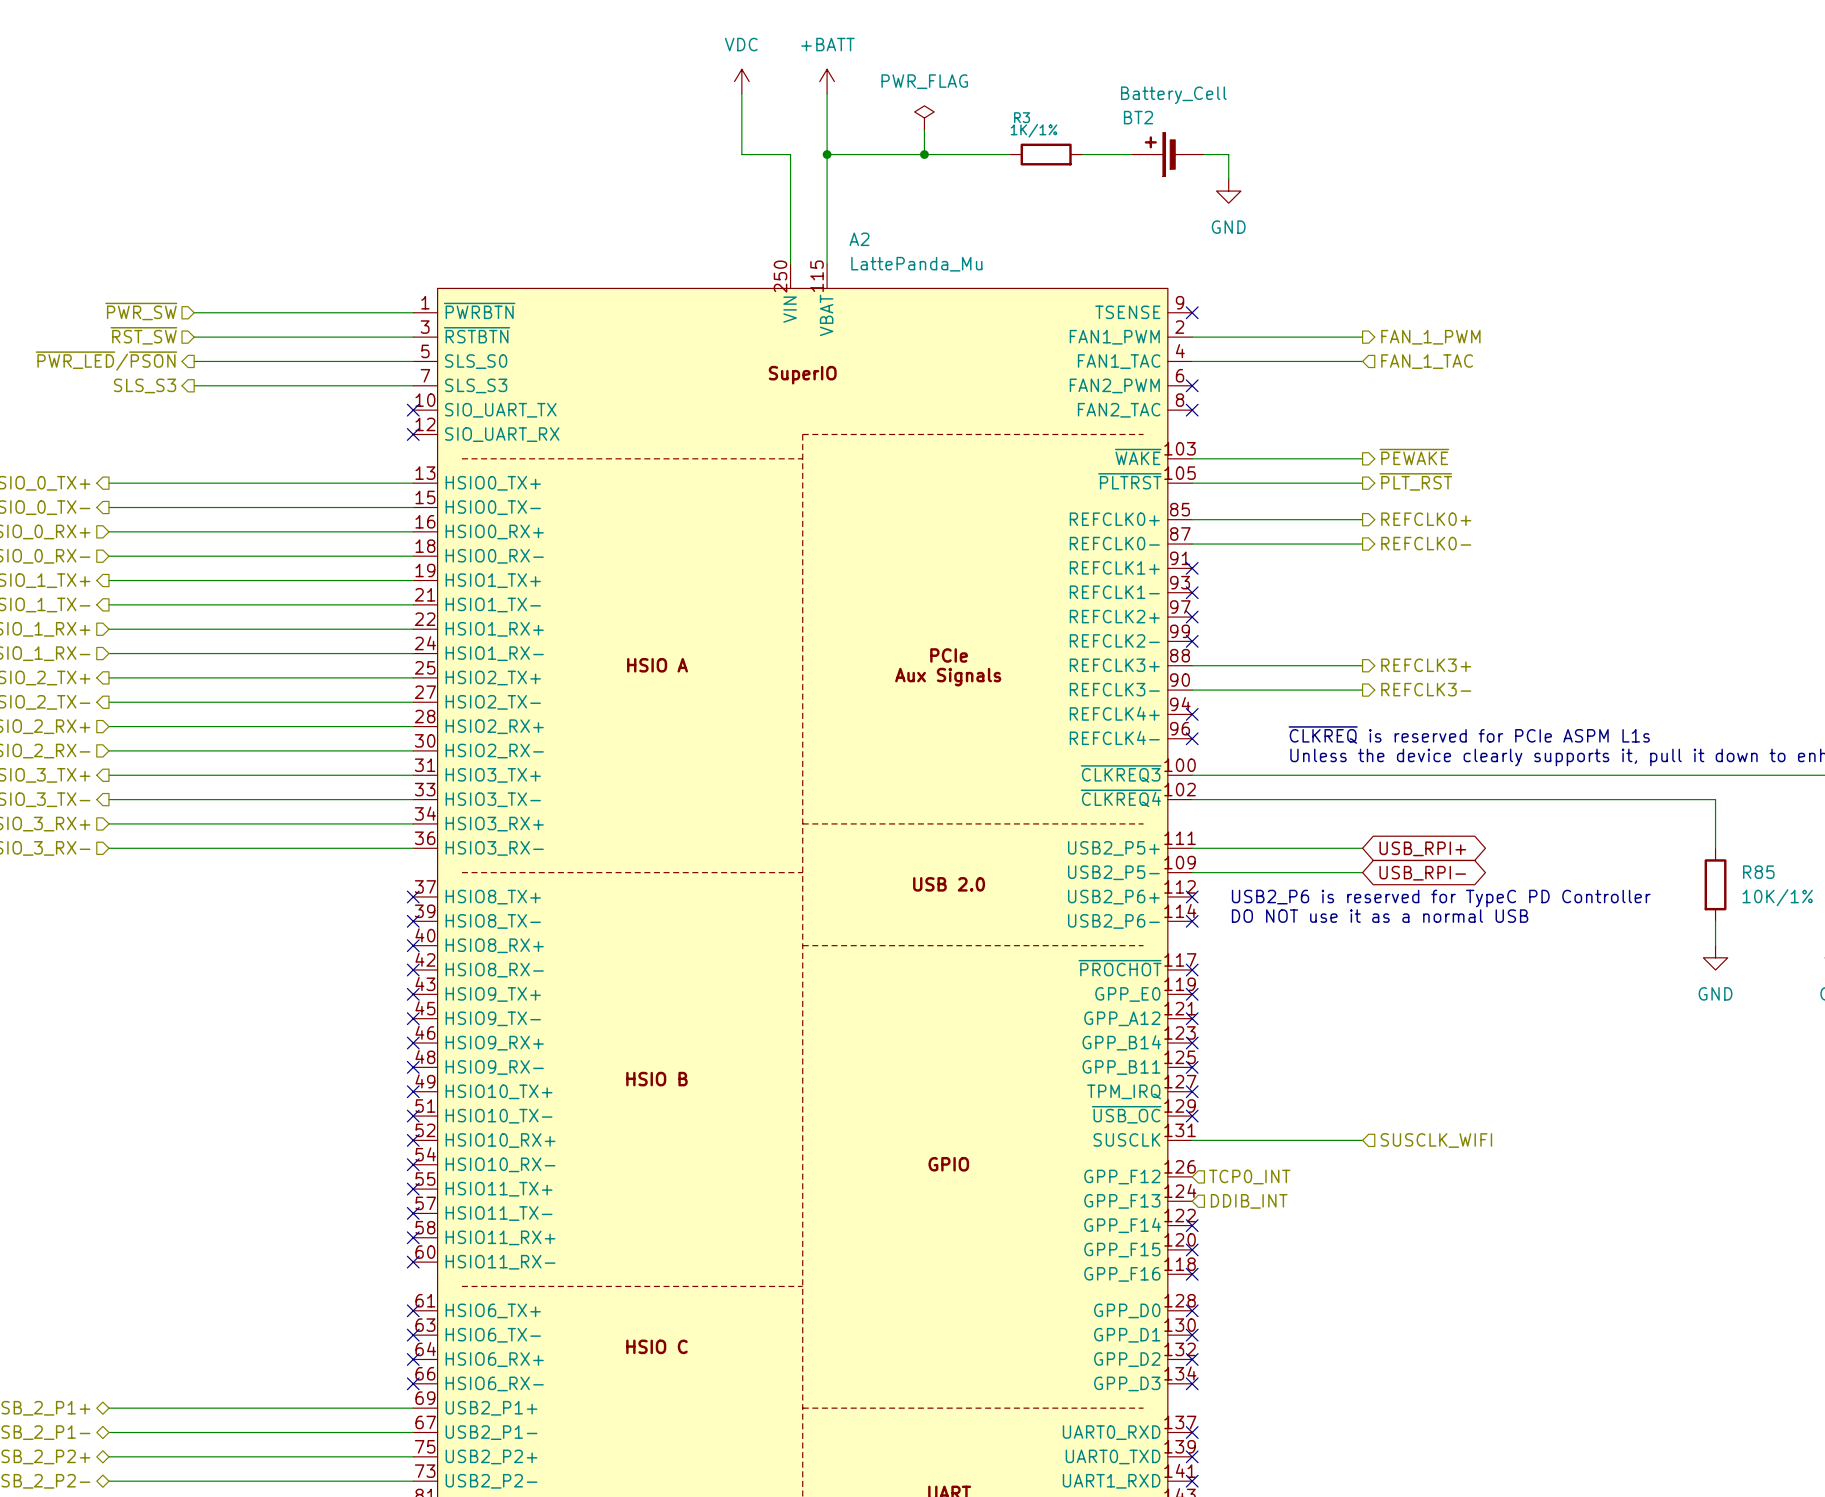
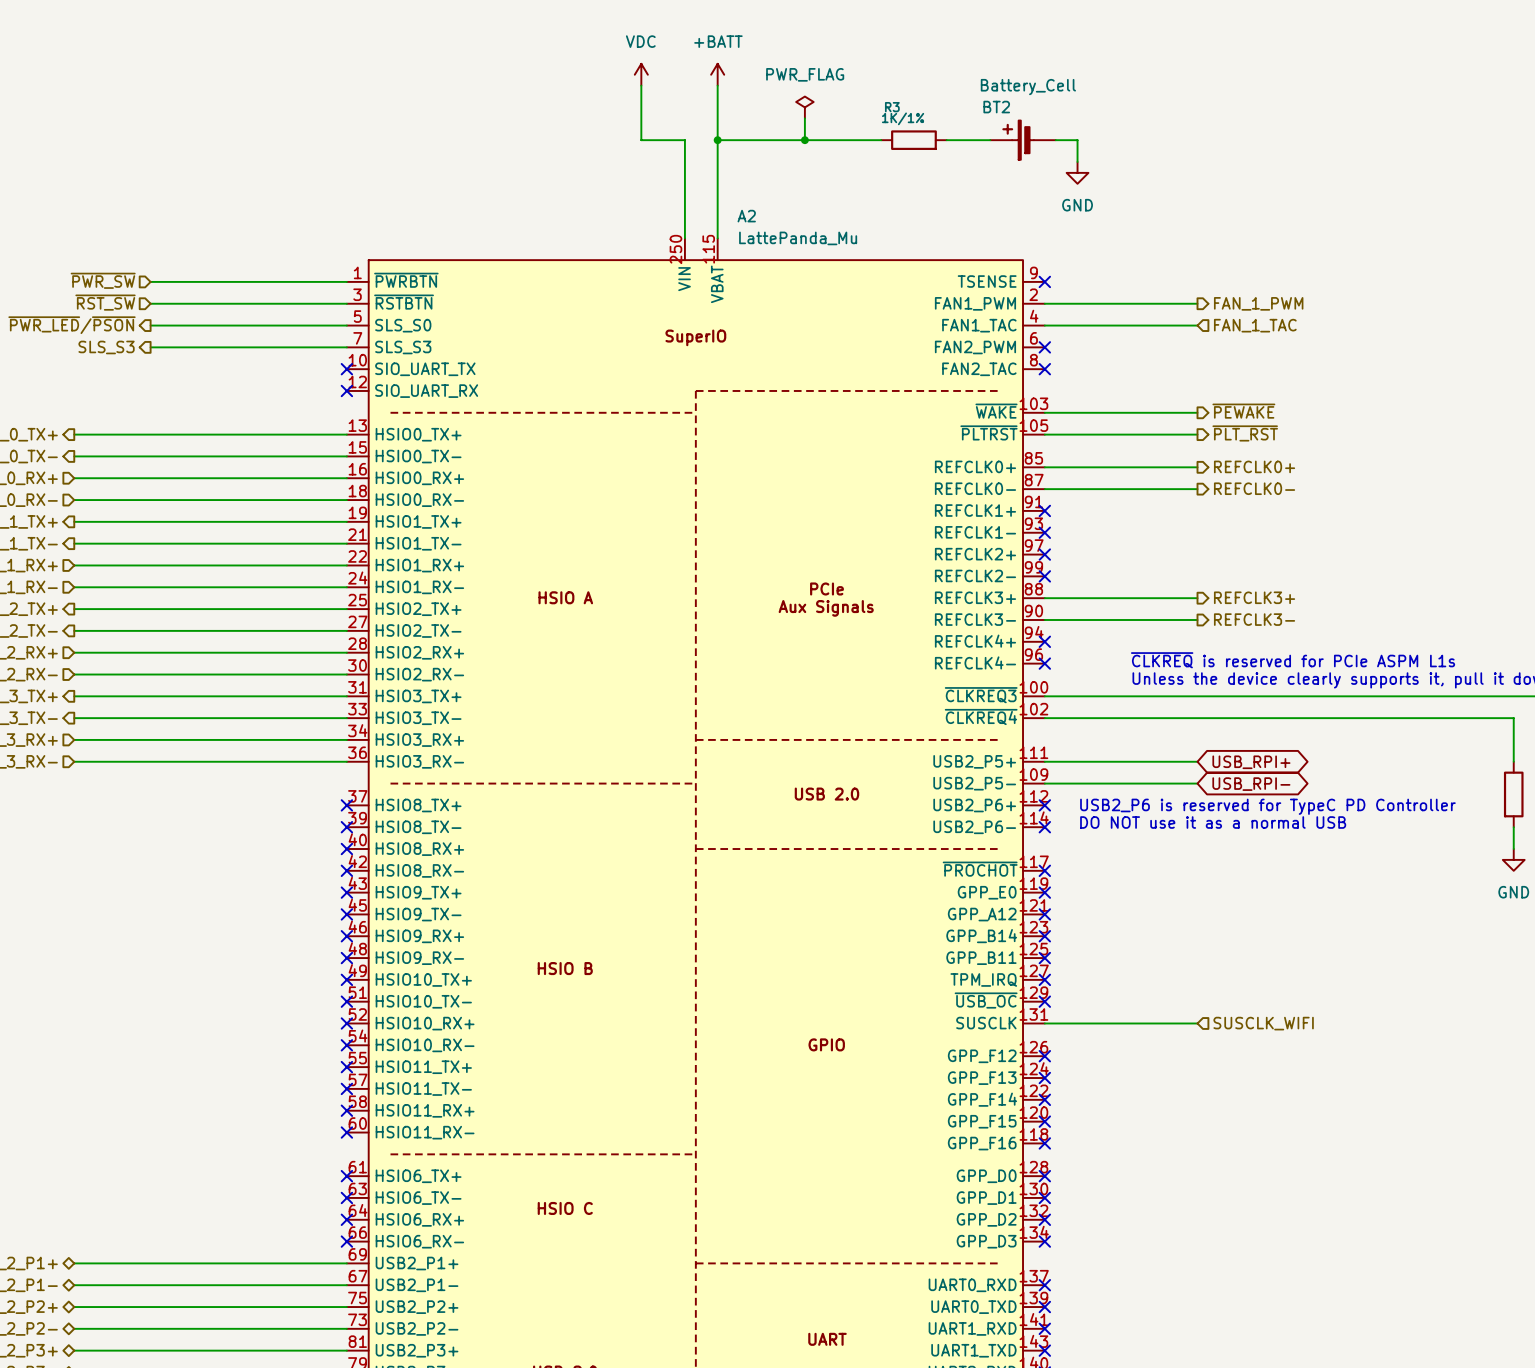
no-connect mark: none -> (1044, 1056)
hierarchical label: TCP0_INT (1249, 1177) -> none
no-connect mark: none -> (1044, 1078)
hierarchical label: DDIB_INT (1249, 1201) -> none

